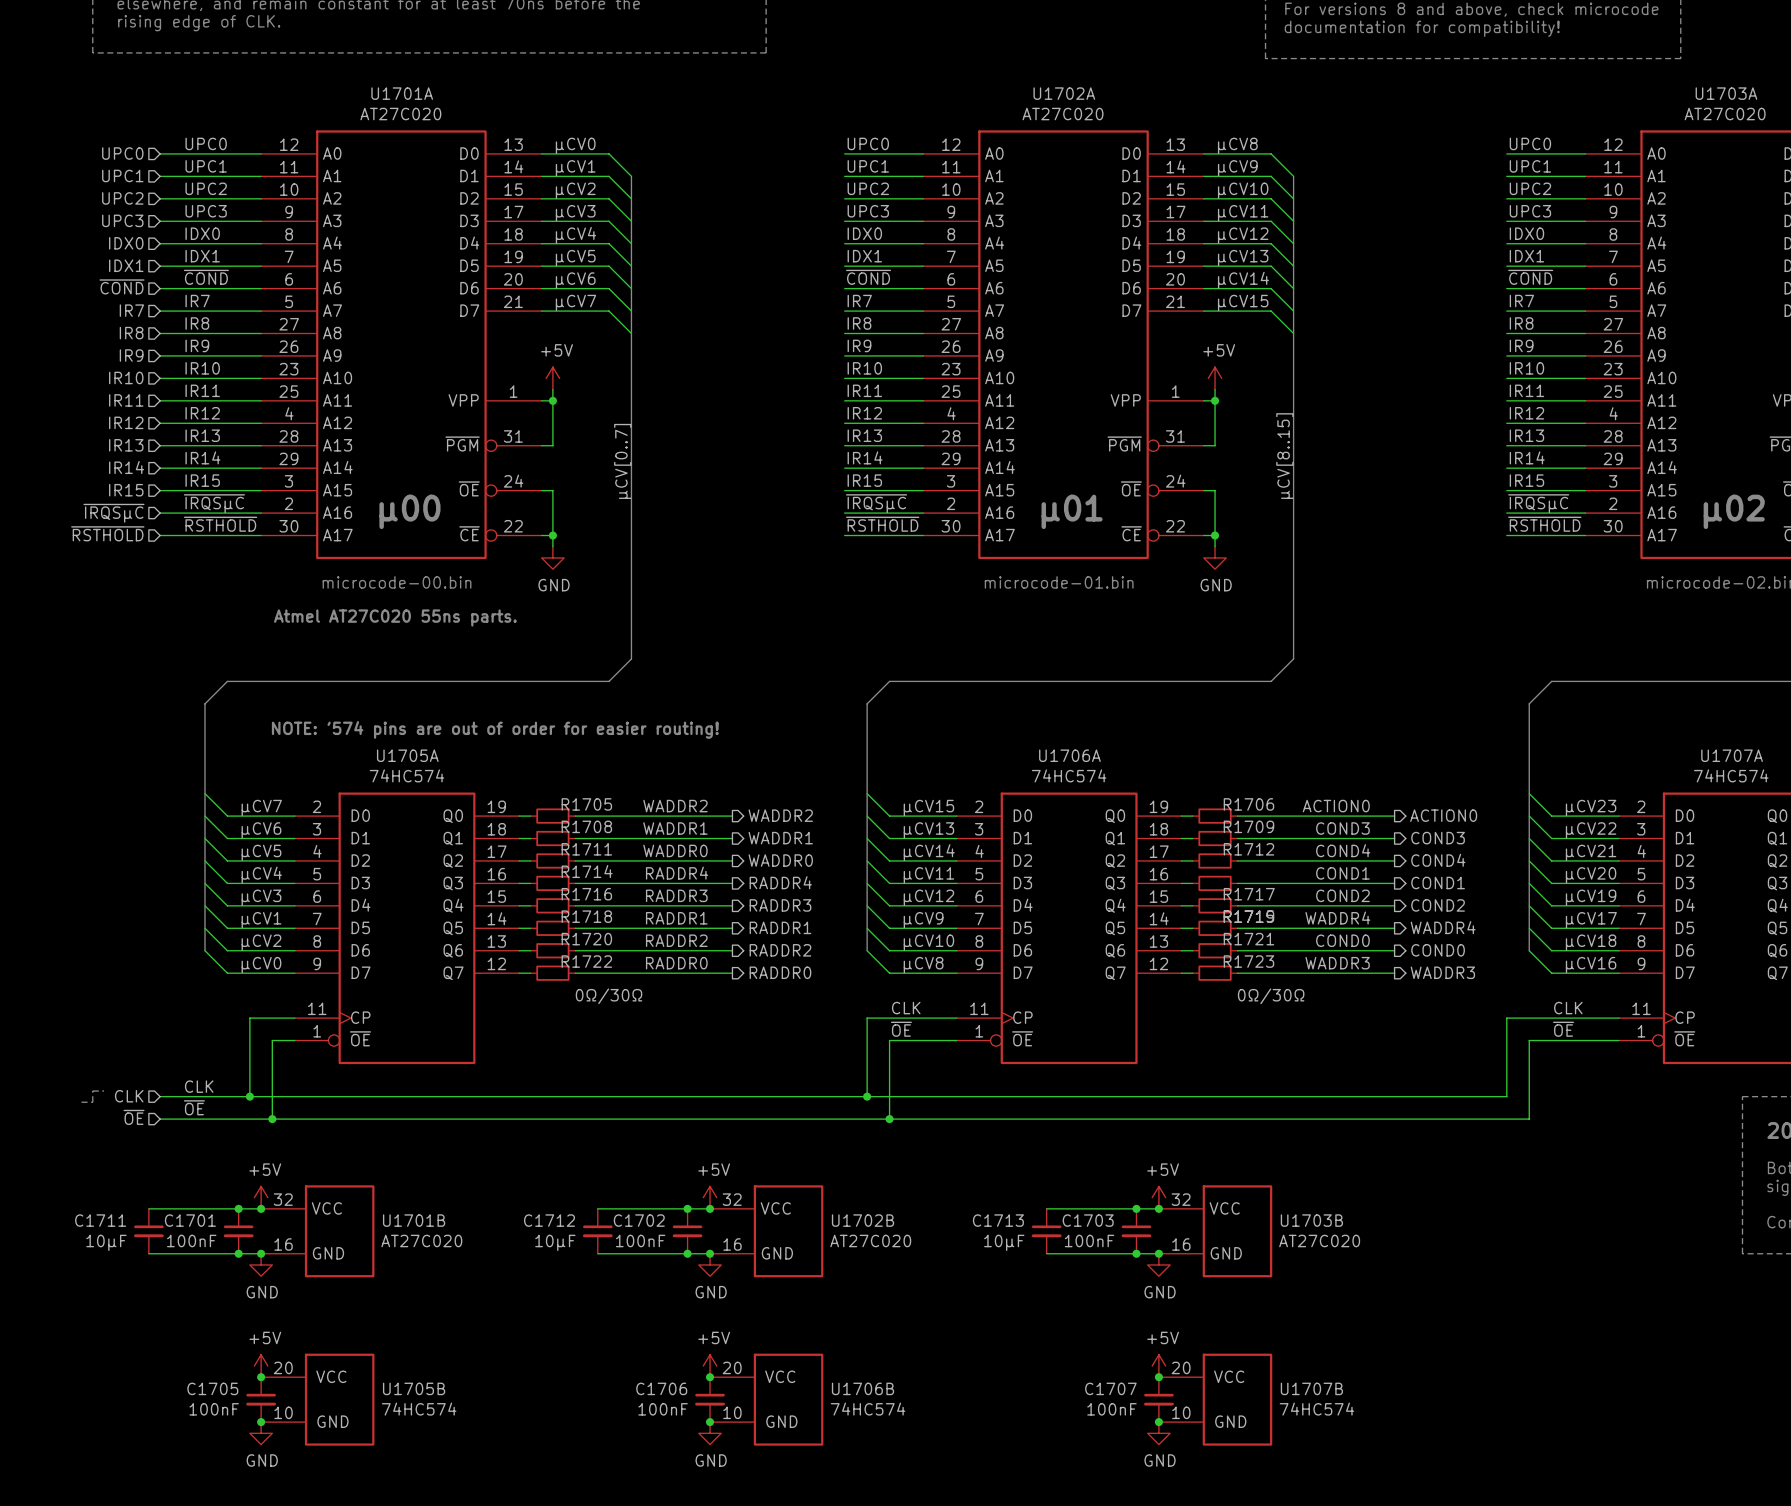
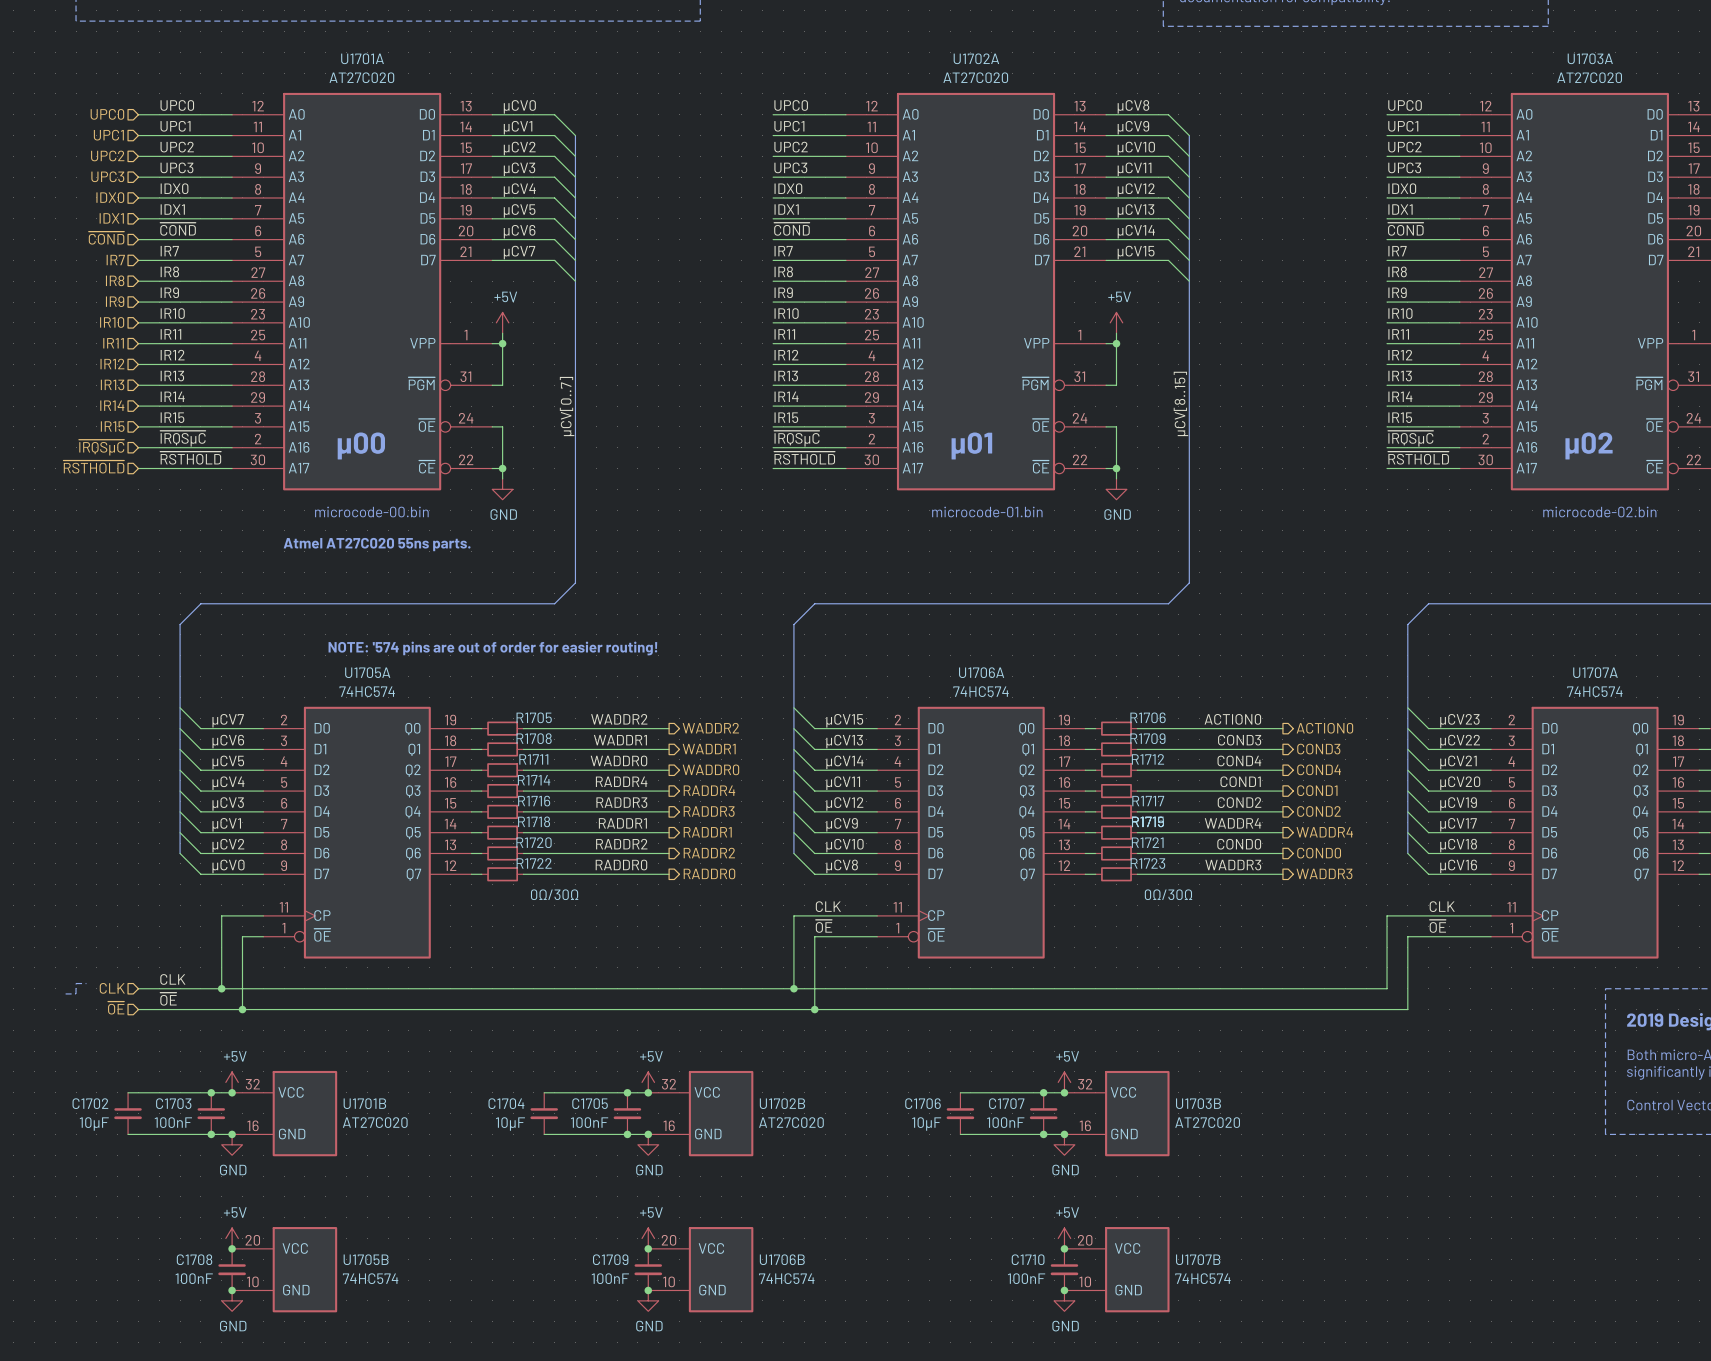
C1711 name: C1711 (100, 1220) -> C1702 (90, 1103)
C1701 name: C1701 (190, 1220) -> C1703 (173, 1103)
C1712 name: C1712 (549, 1220) -> C1704 (506, 1103)
C1702 name: C1702 (639, 1220) -> C1705 (590, 1103)
C1713 name: C1713 (998, 1220) -> C1706 (922, 1103)
C1703 name: C1703 (1088, 1220) -> C1707 (1006, 1103)
C1705 name: C1705 (212, 1388) -> C1708 (194, 1259)
C1706 name: C1706 (661, 1388) -> C1709 (610, 1259)
C1707 name: C1707 (1110, 1388) -> C1710 (1028, 1259)

